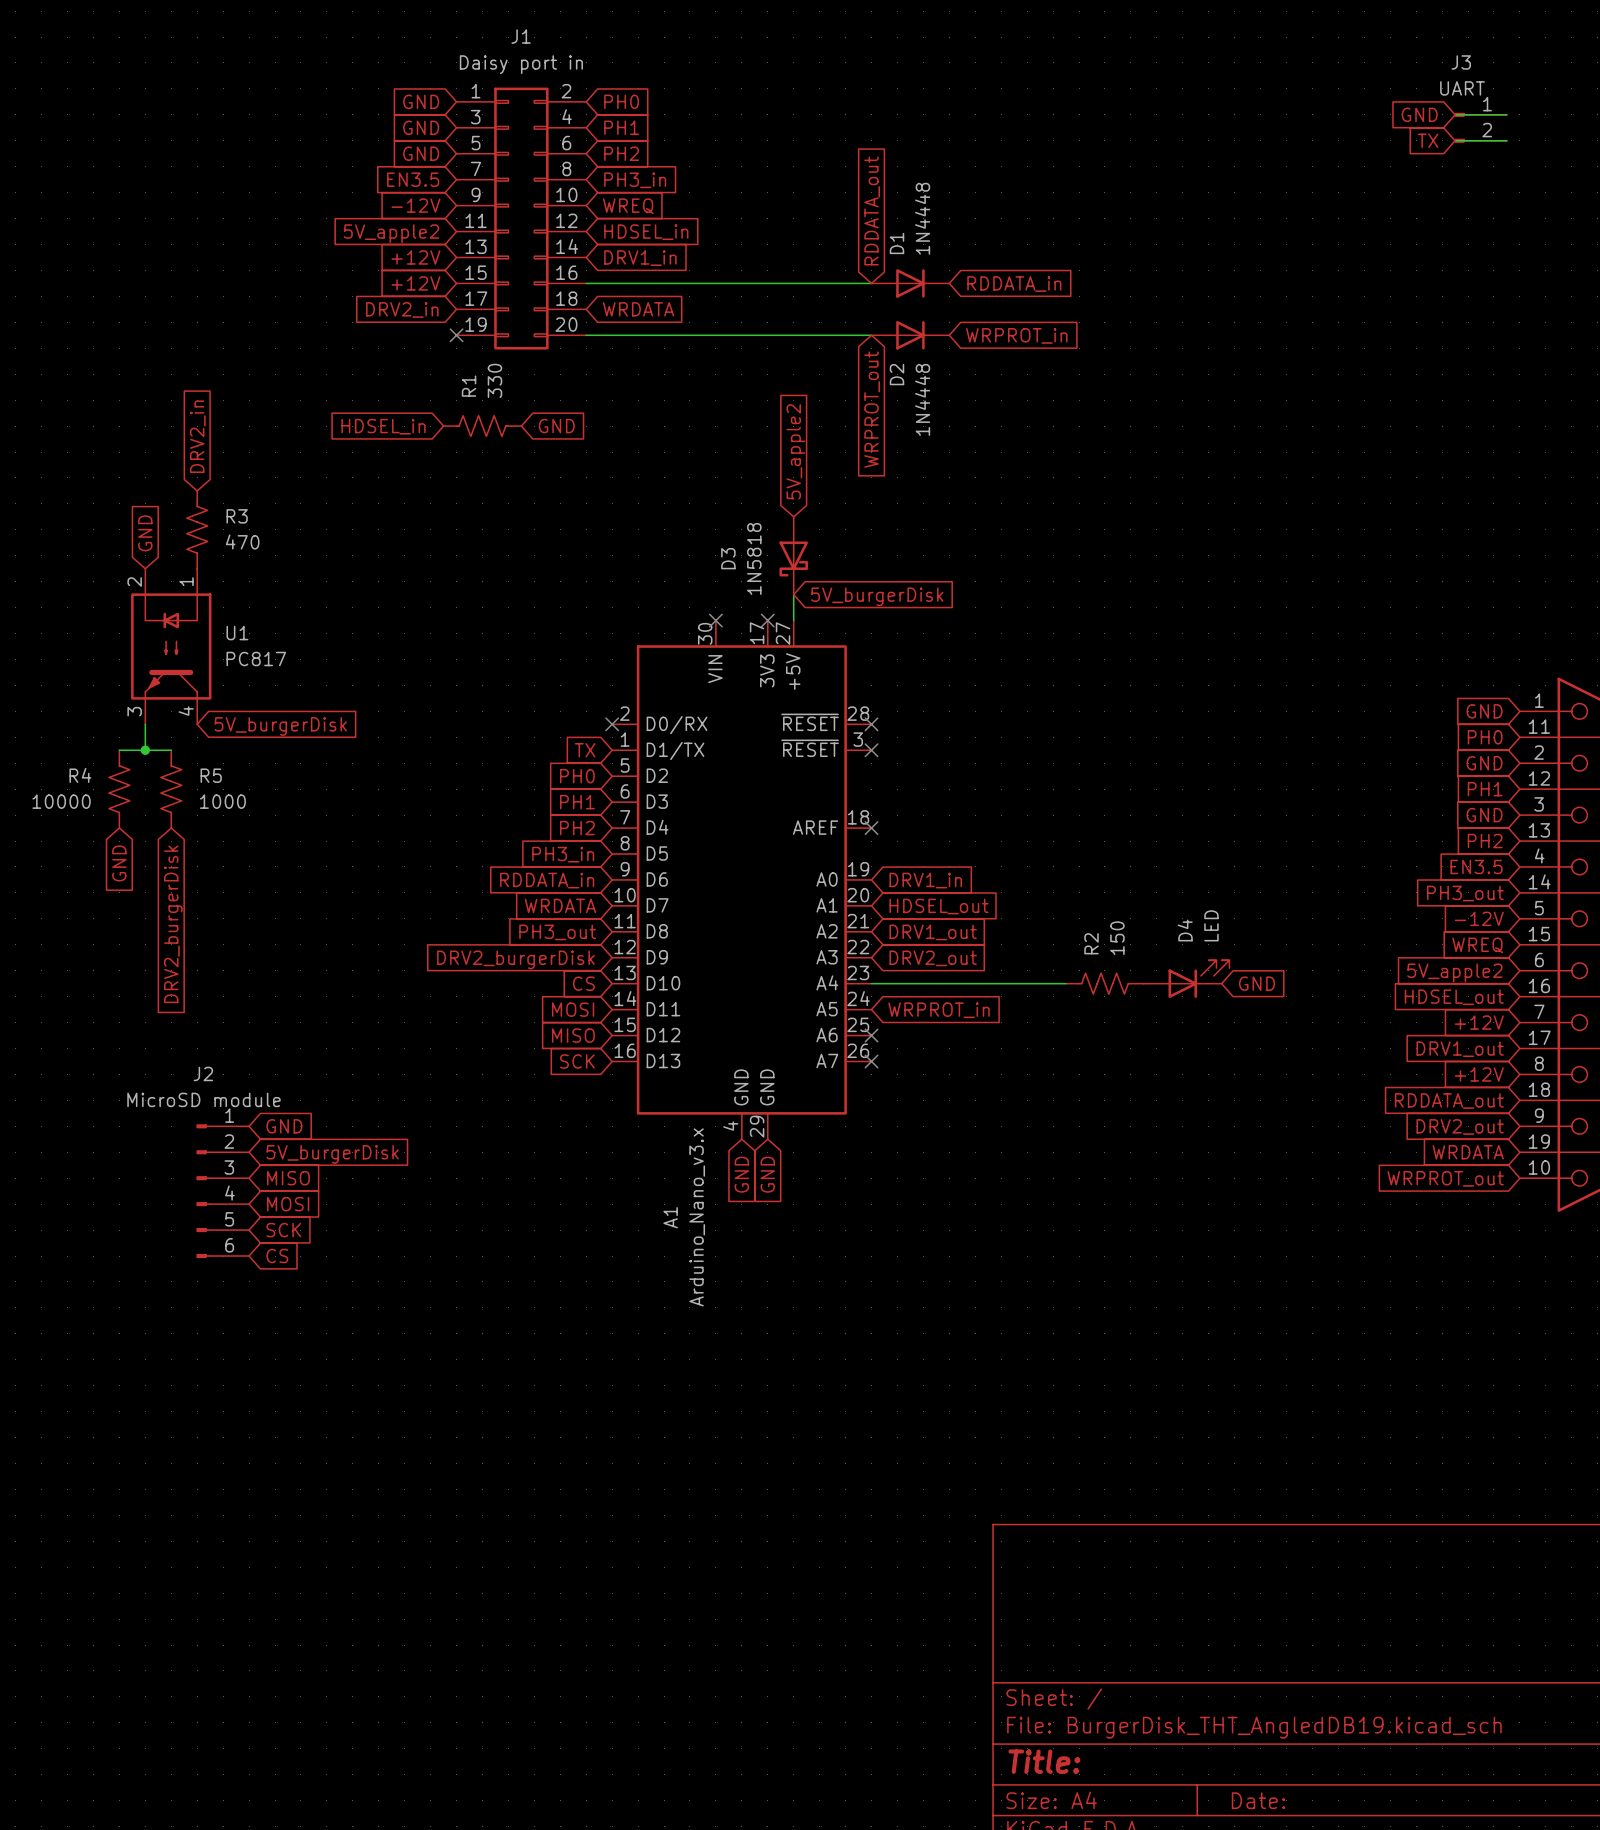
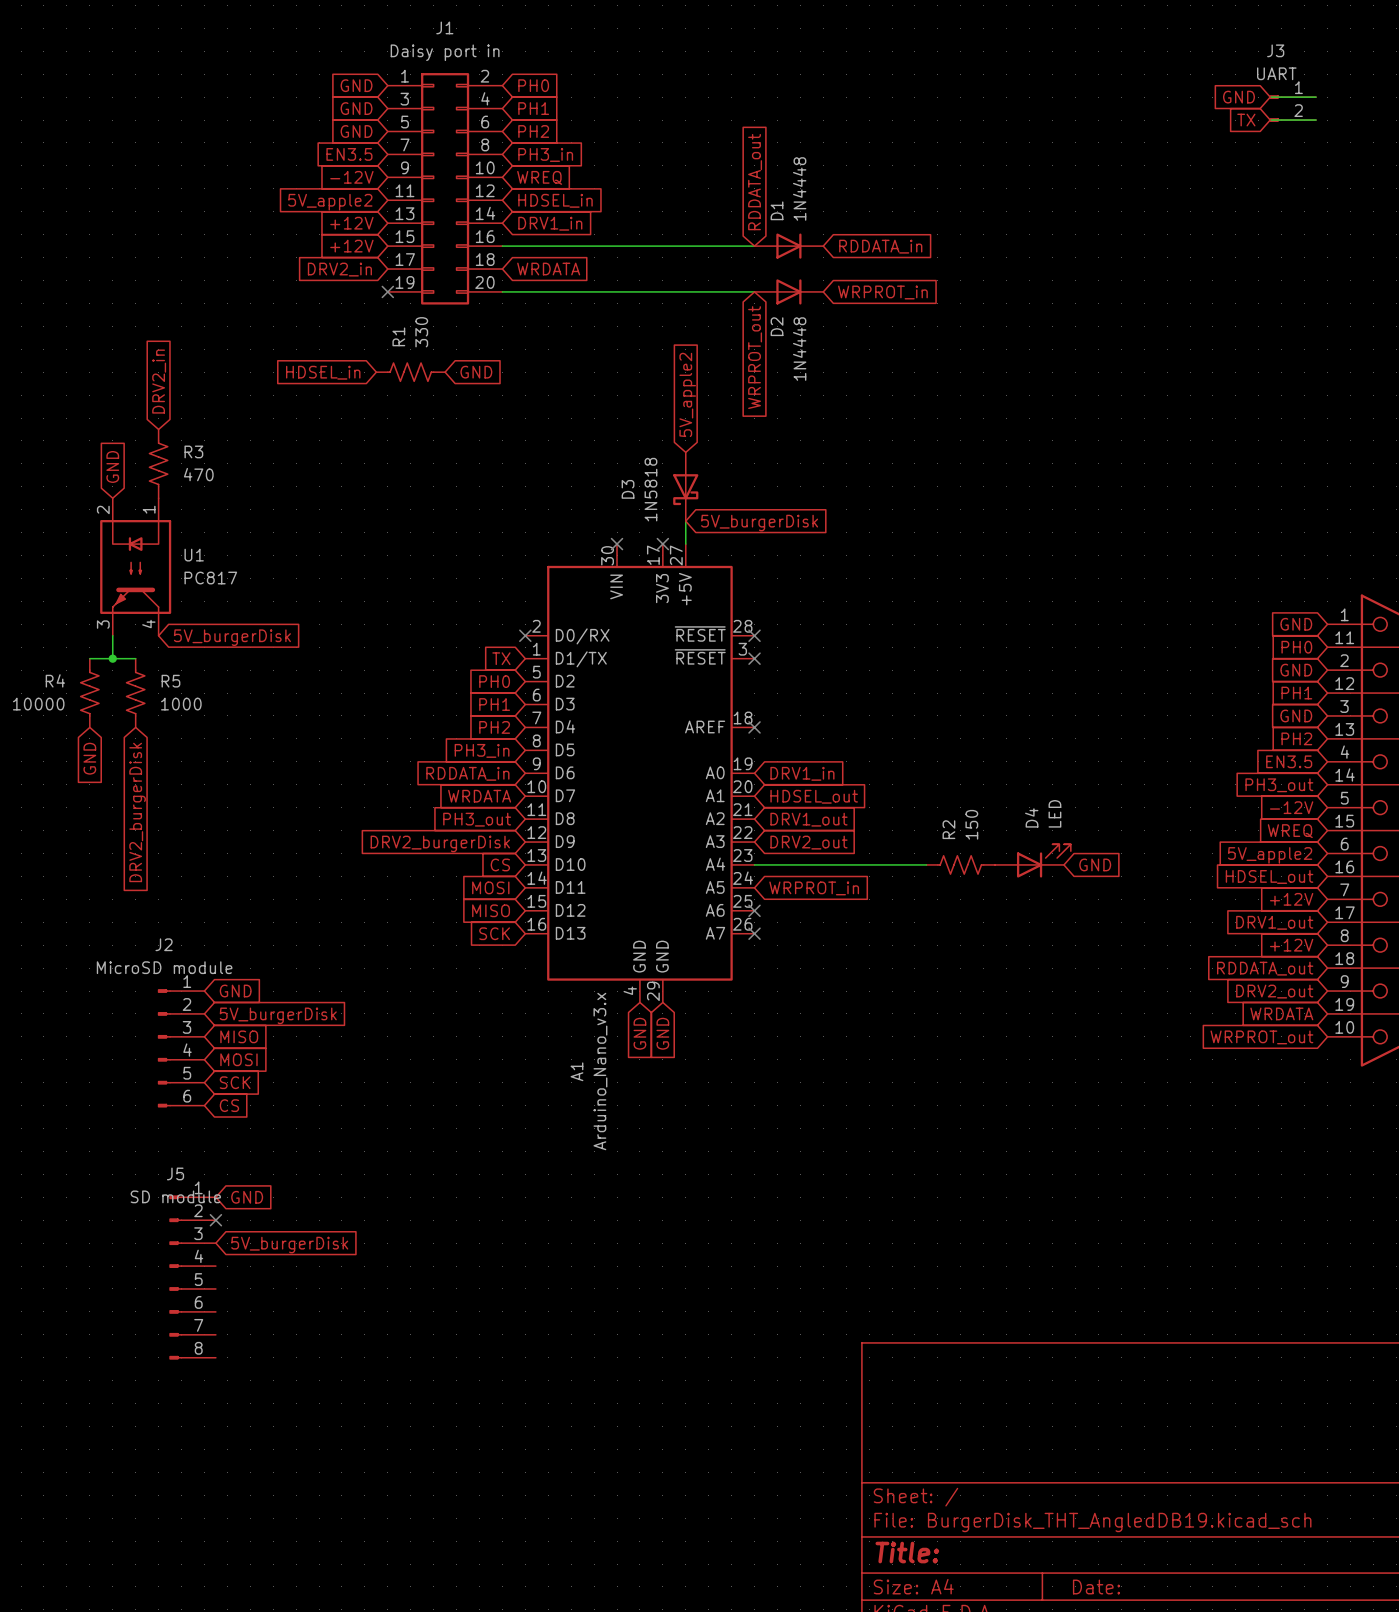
global label: none -> GND (247, 1197)
no-connect mark: none -> (215, 1220)
global label: none -> 5V_burgerDisk (289, 1245)
J5: none -> SD module (192, 1277)

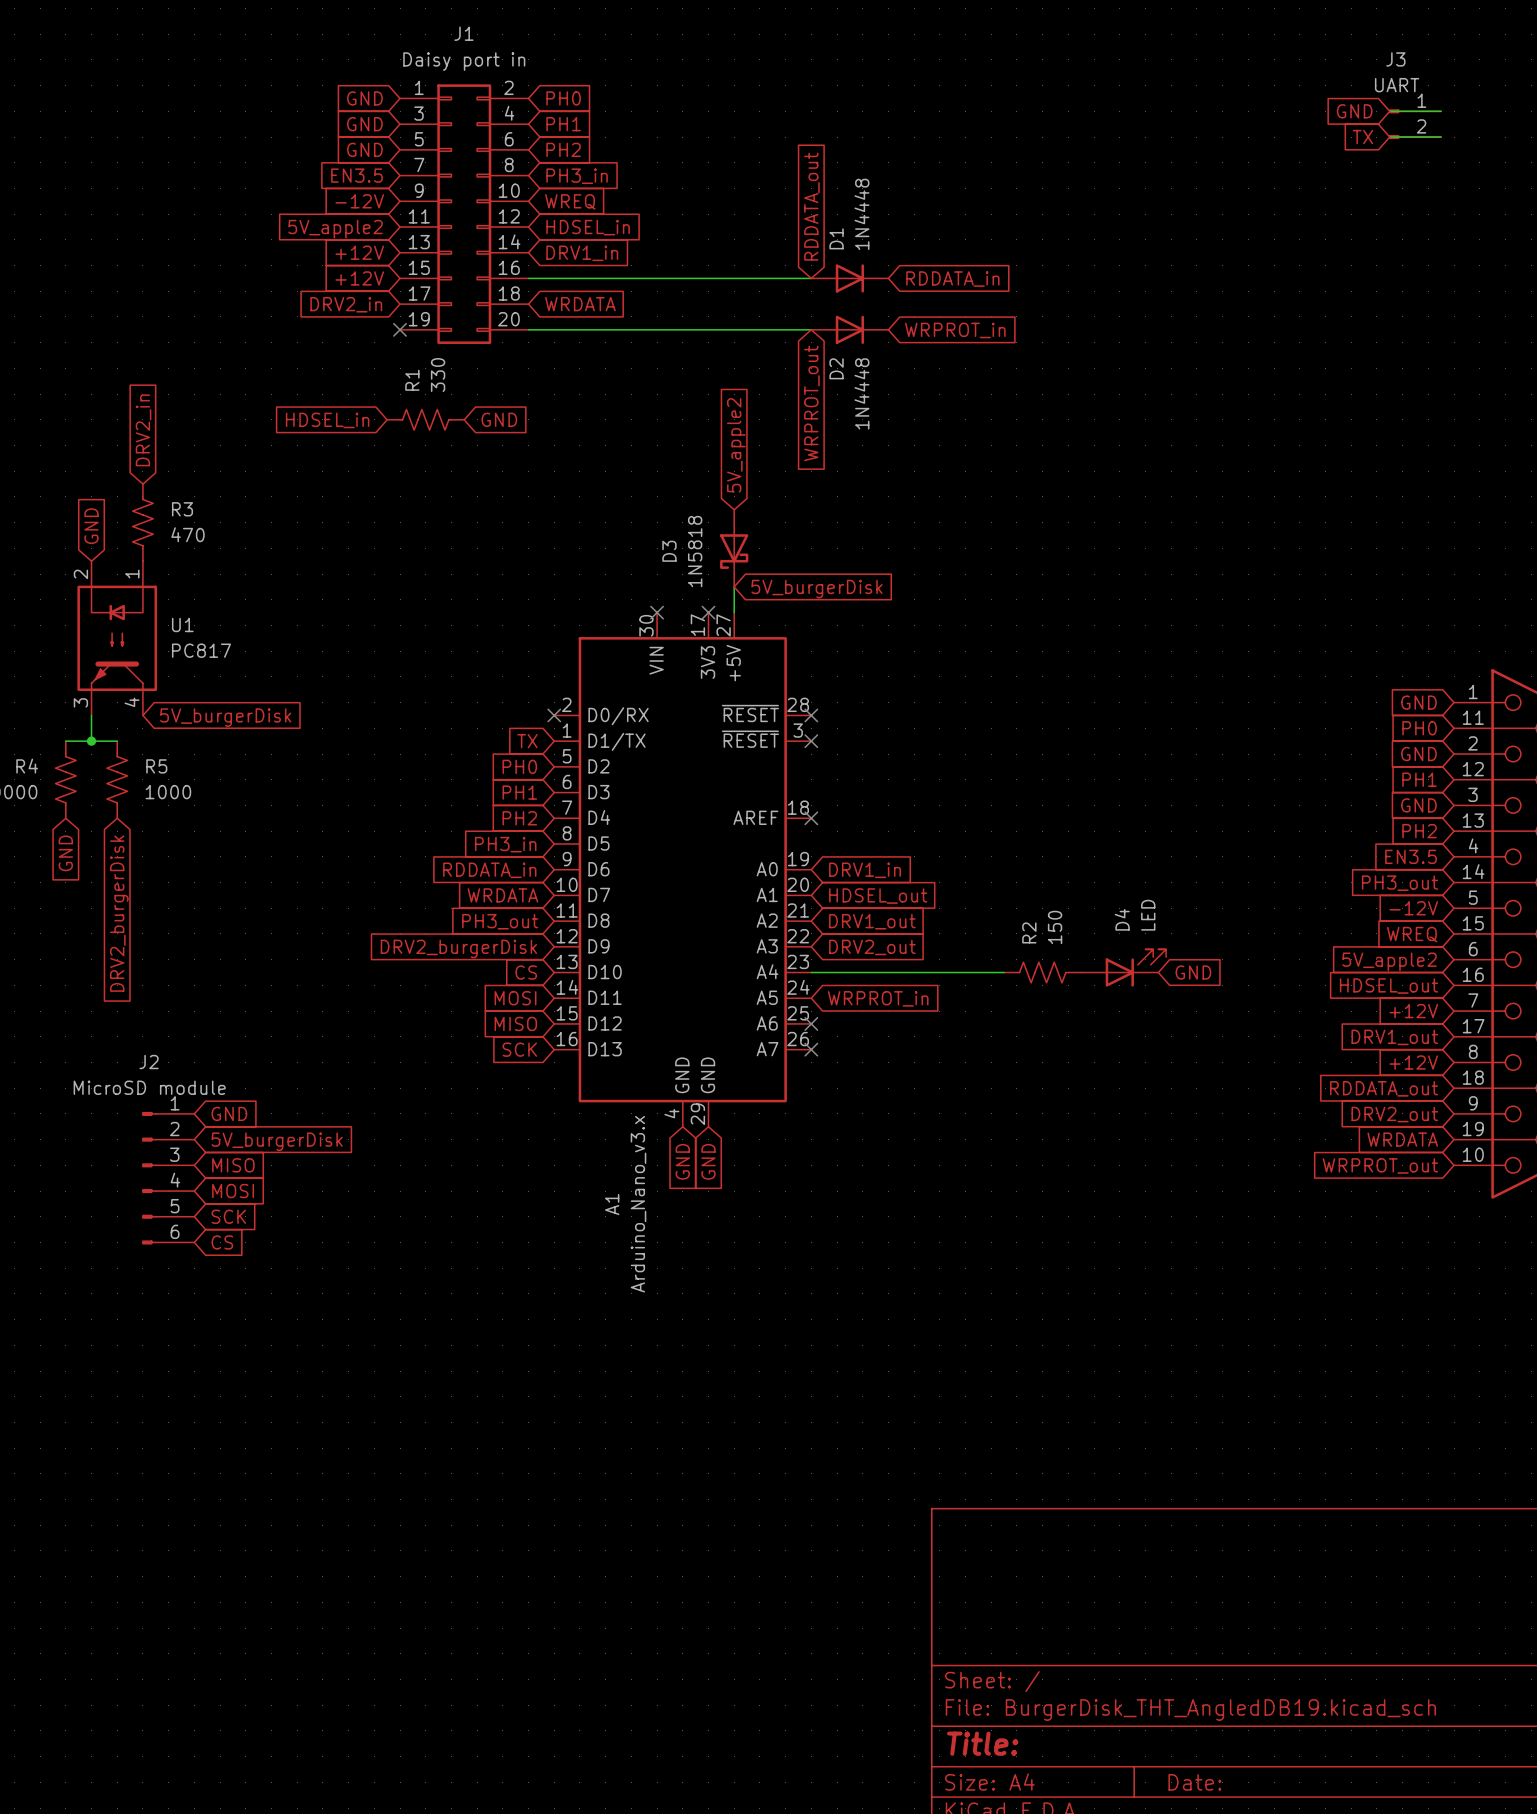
global label: GND (247, 1197) -> none
no-connect mark: (215, 1220) -> none
global label: 5V_burgerDisk (289, 1245) -> none
J5: SD module (192, 1277) -> none

